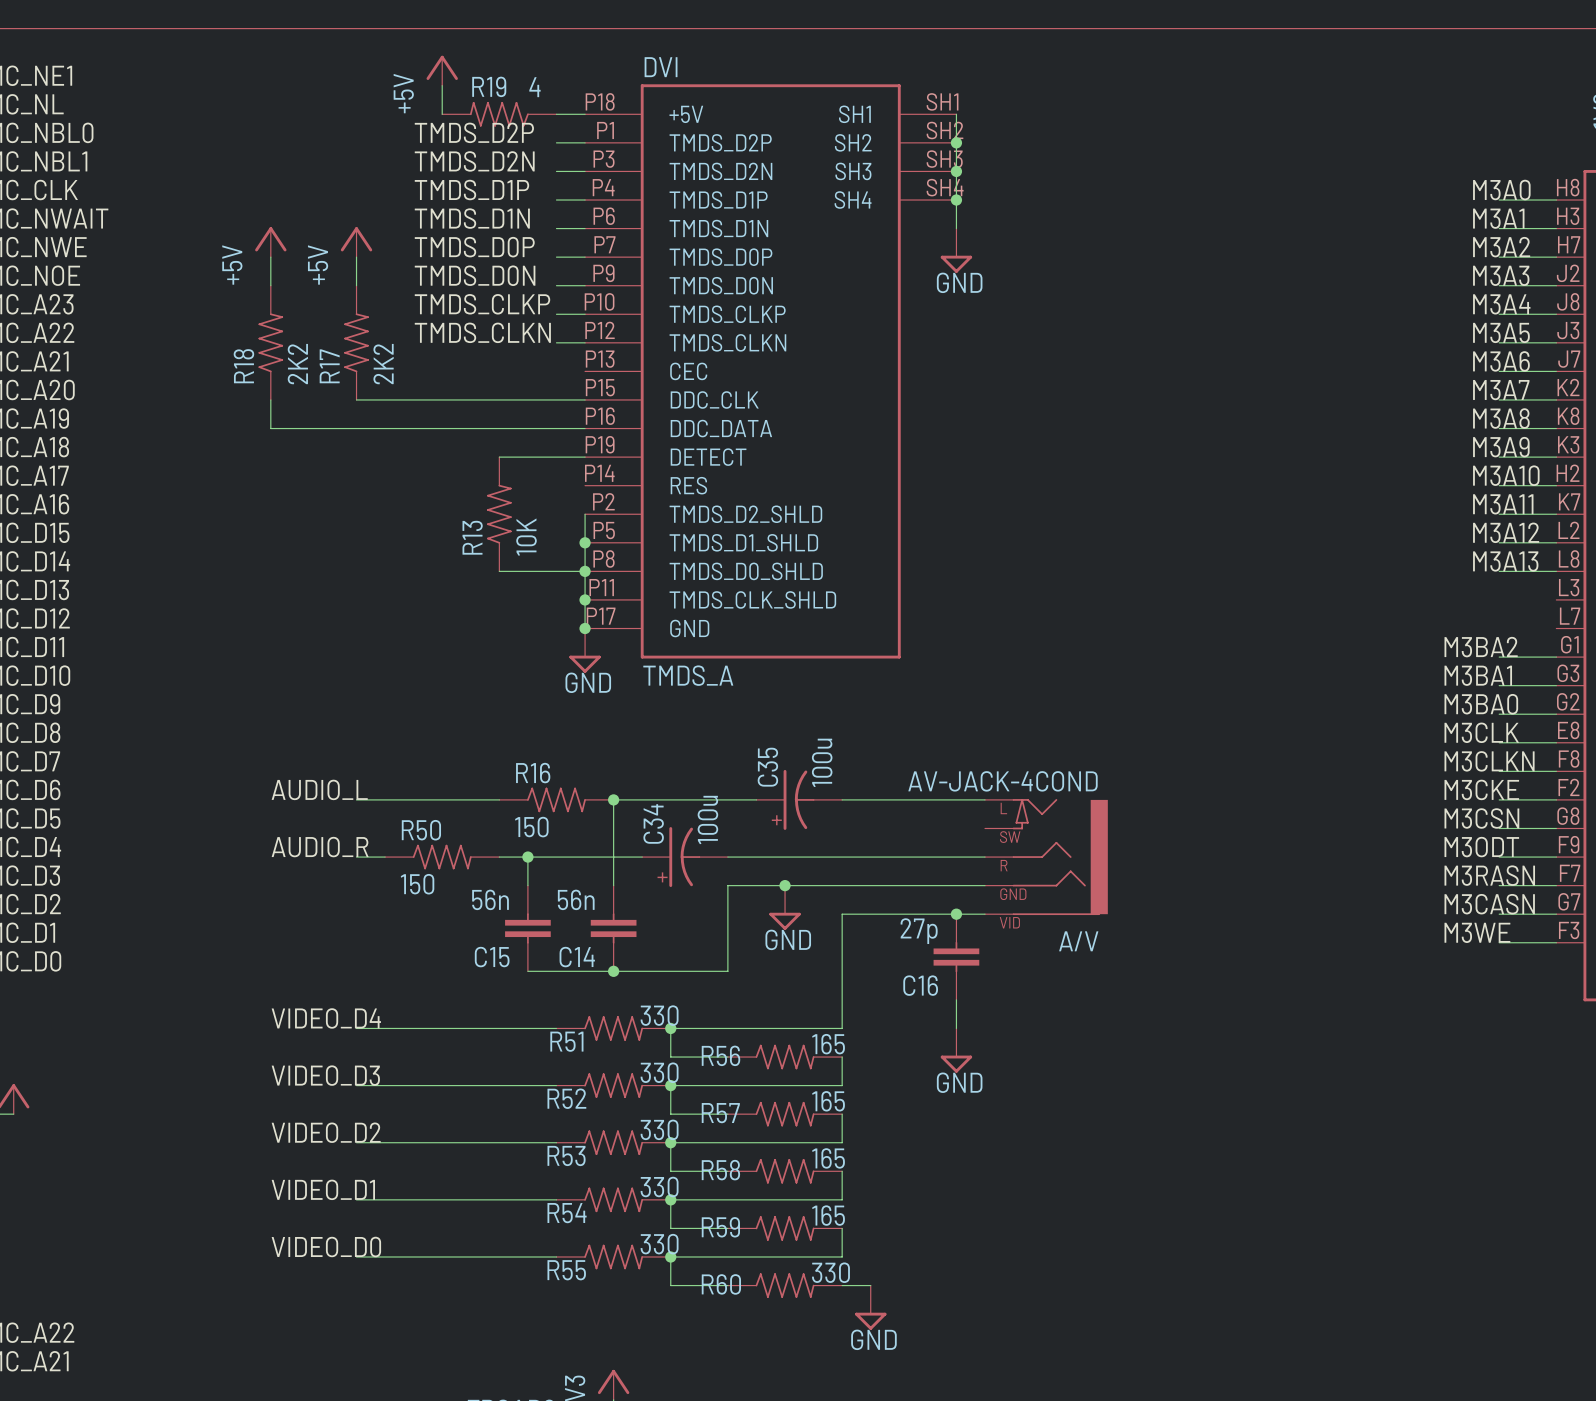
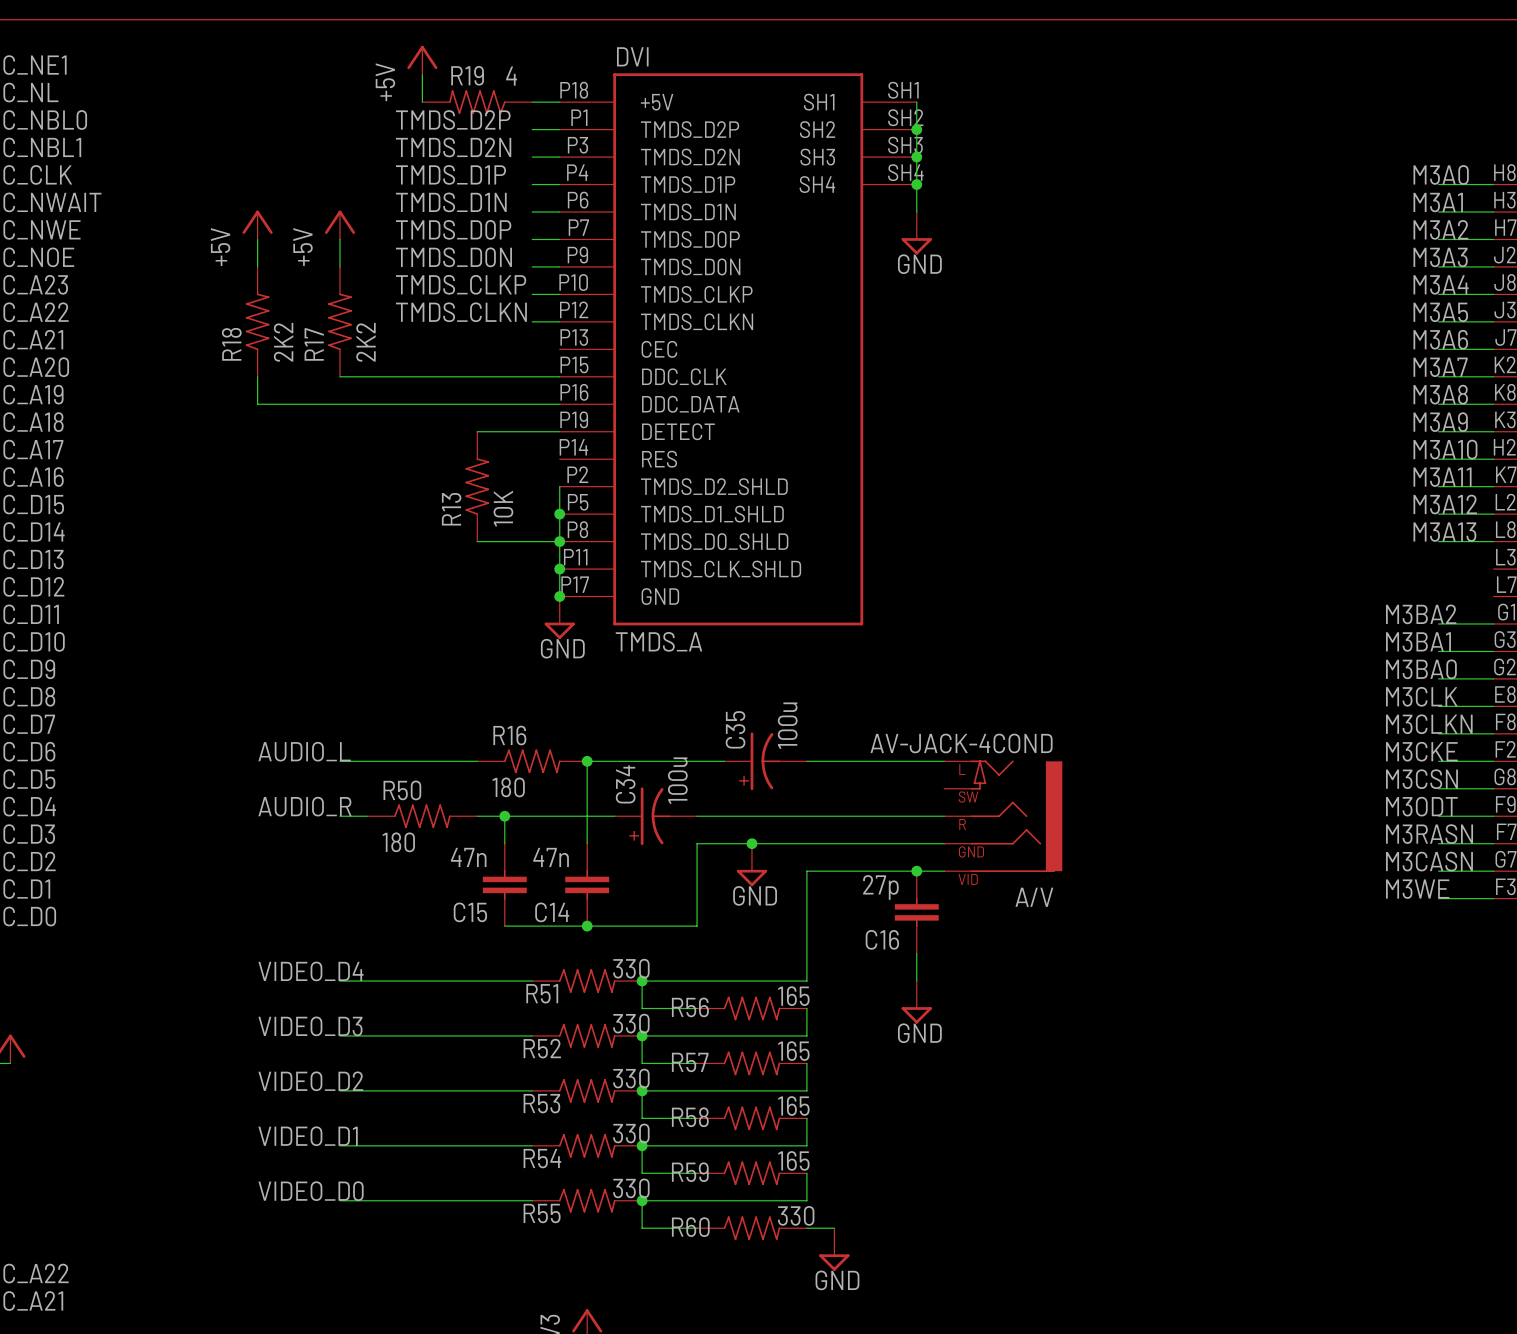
R16 value: 150 (531, 827) -> 180 (508, 787)
R50 value: 150 (417, 884) -> 180 (398, 842)
C15 value: 56n (490, 899) -> 47n (468, 857)
C14 value: 56n (576, 899) -> 47n (551, 857)

